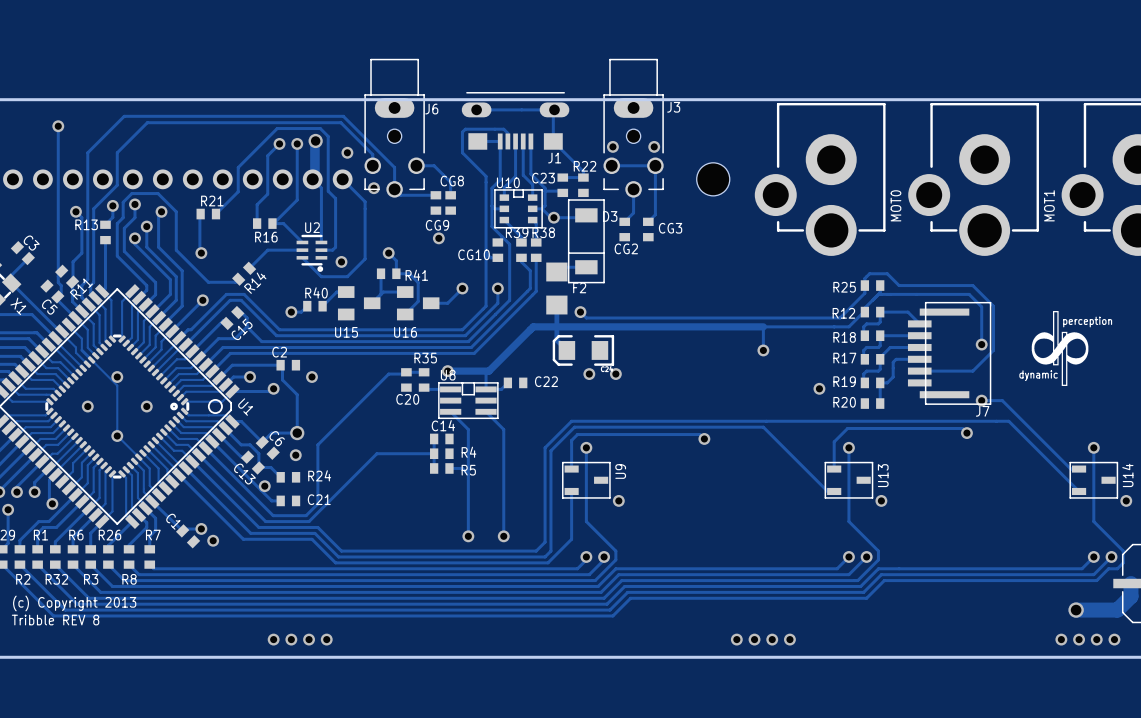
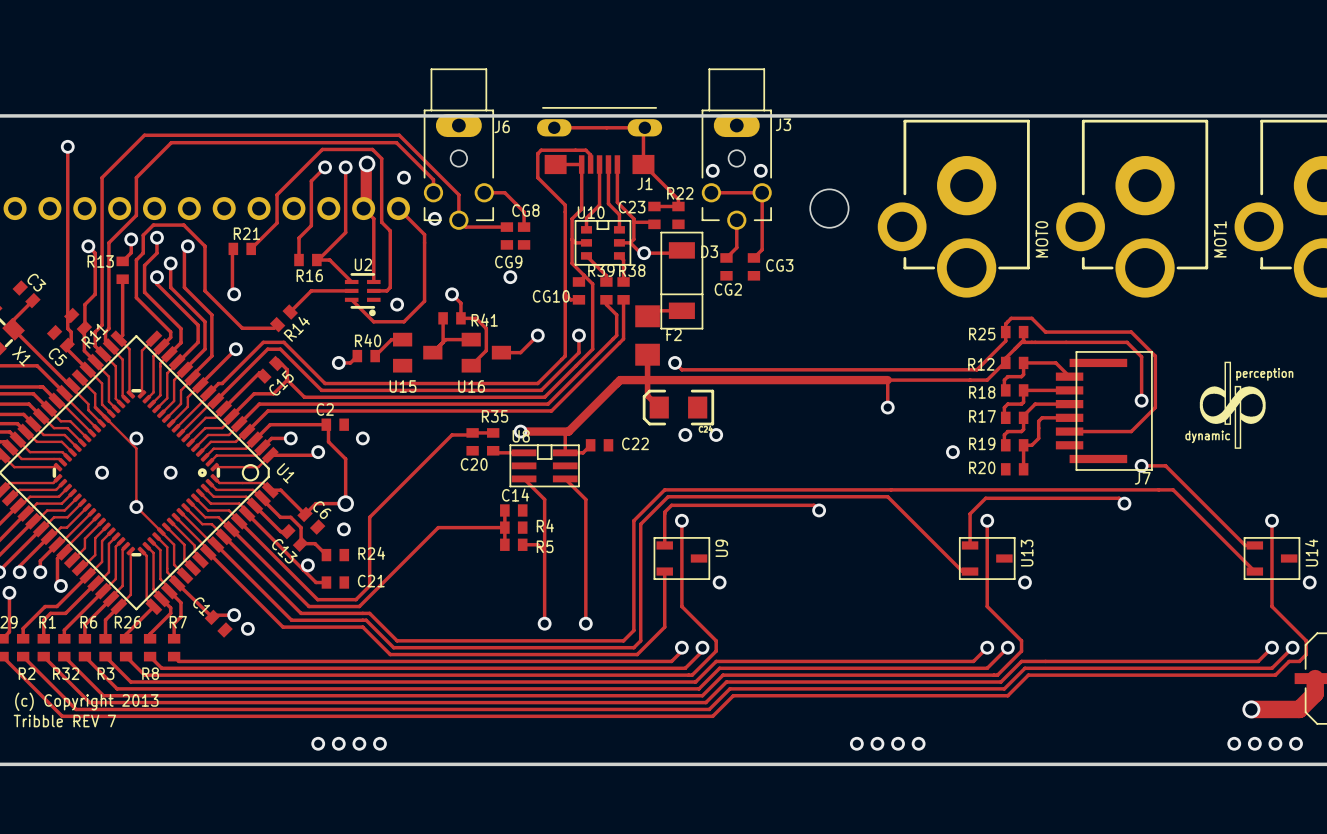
text: Tribble REV 8 (55, 620) -> Tribble REV 7 (64, 721)

